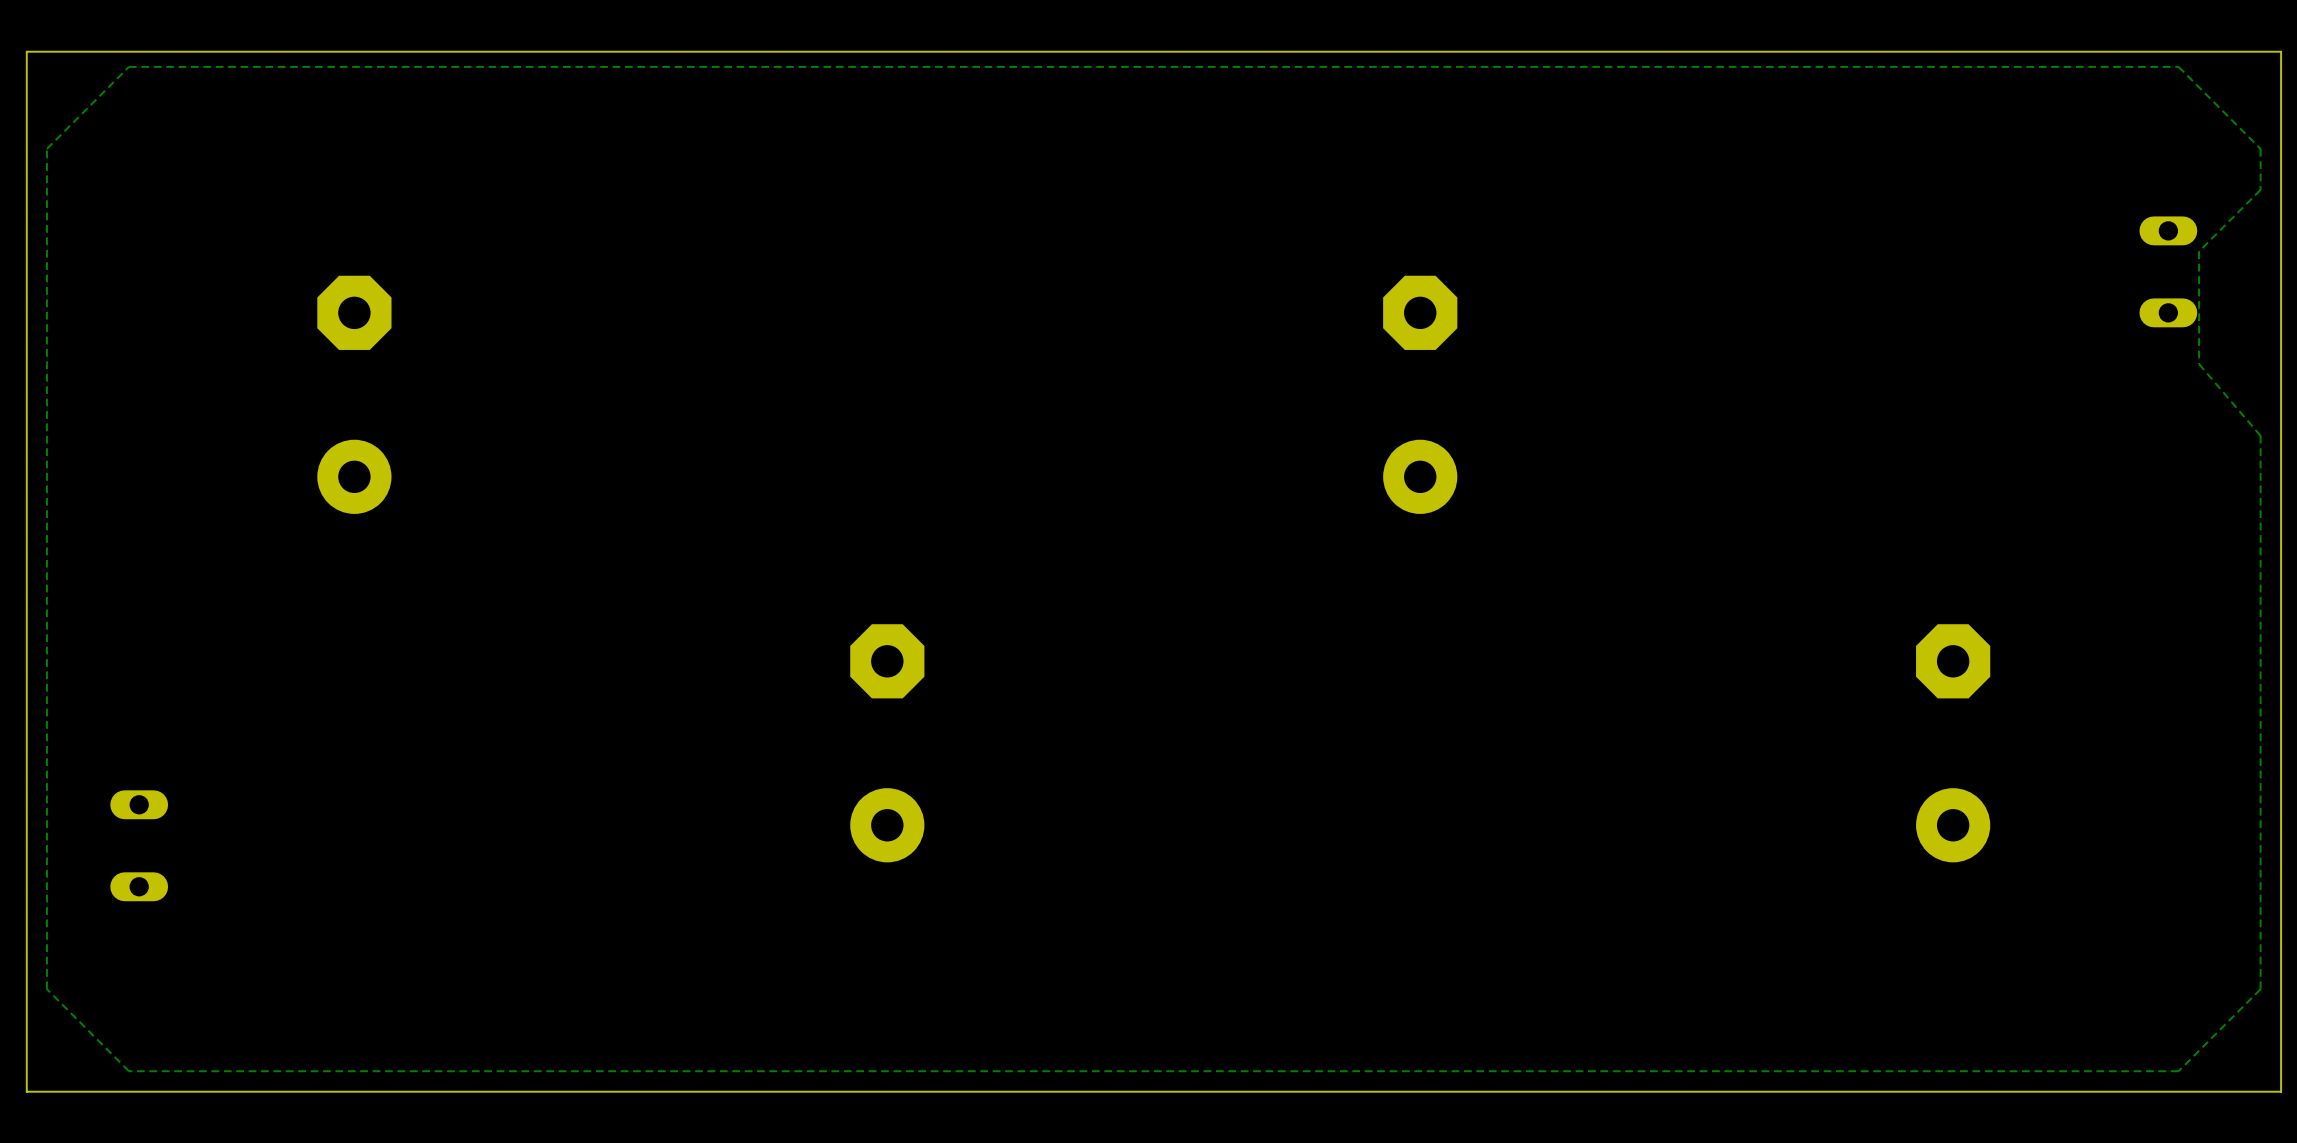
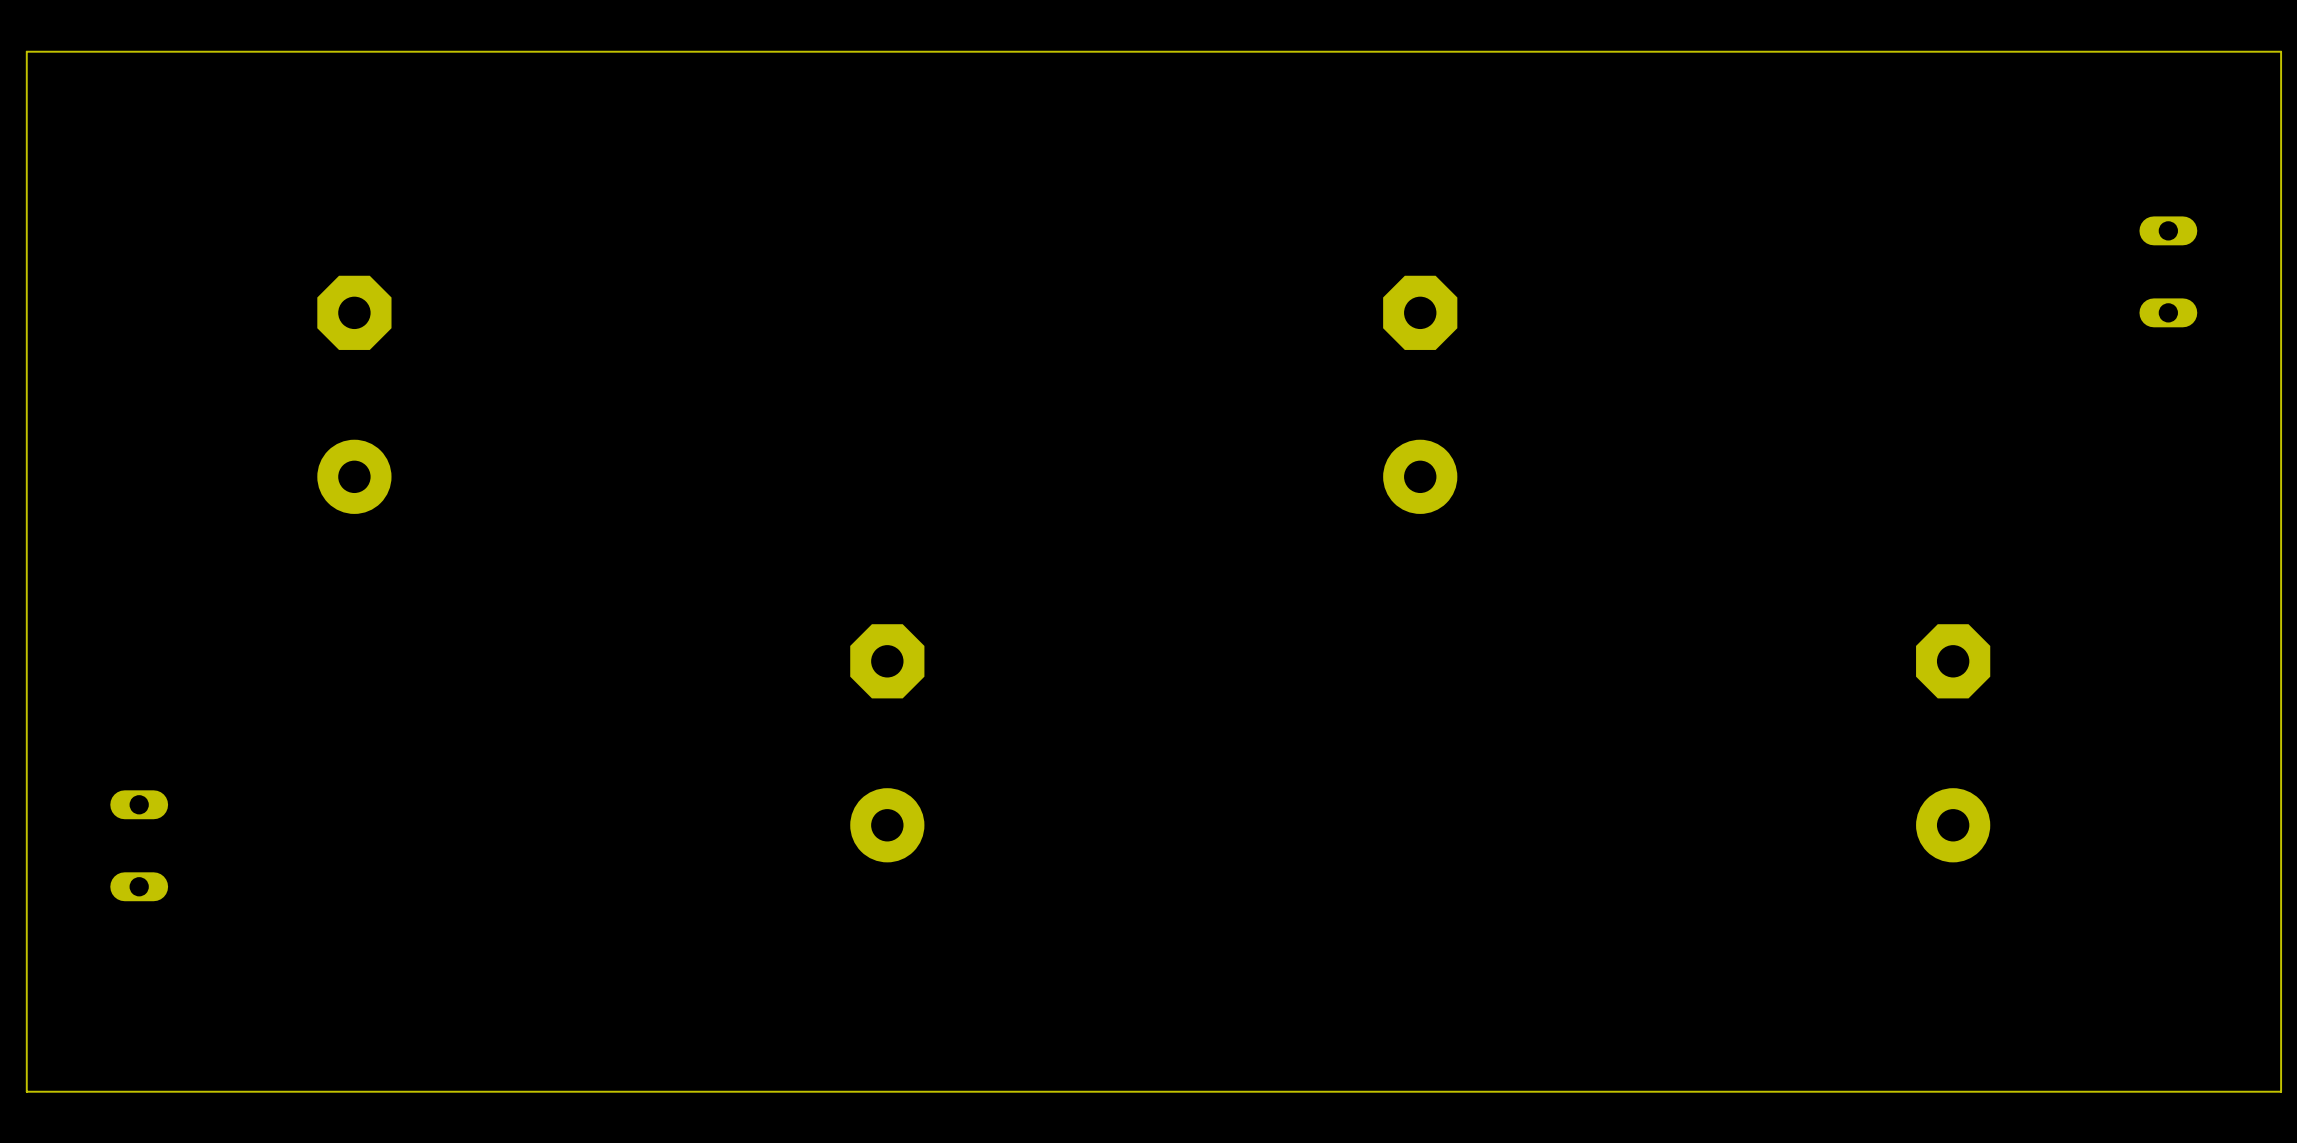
zone outline: (2178, 66) (128, 66) (46, 148) (46, 989) (128, 1071) (2178, 1071) (2260, 989) (2260, 435) (2199, 364) (2199, 251) (2260, 189) (2260, 148) (2178, 66) -> none

